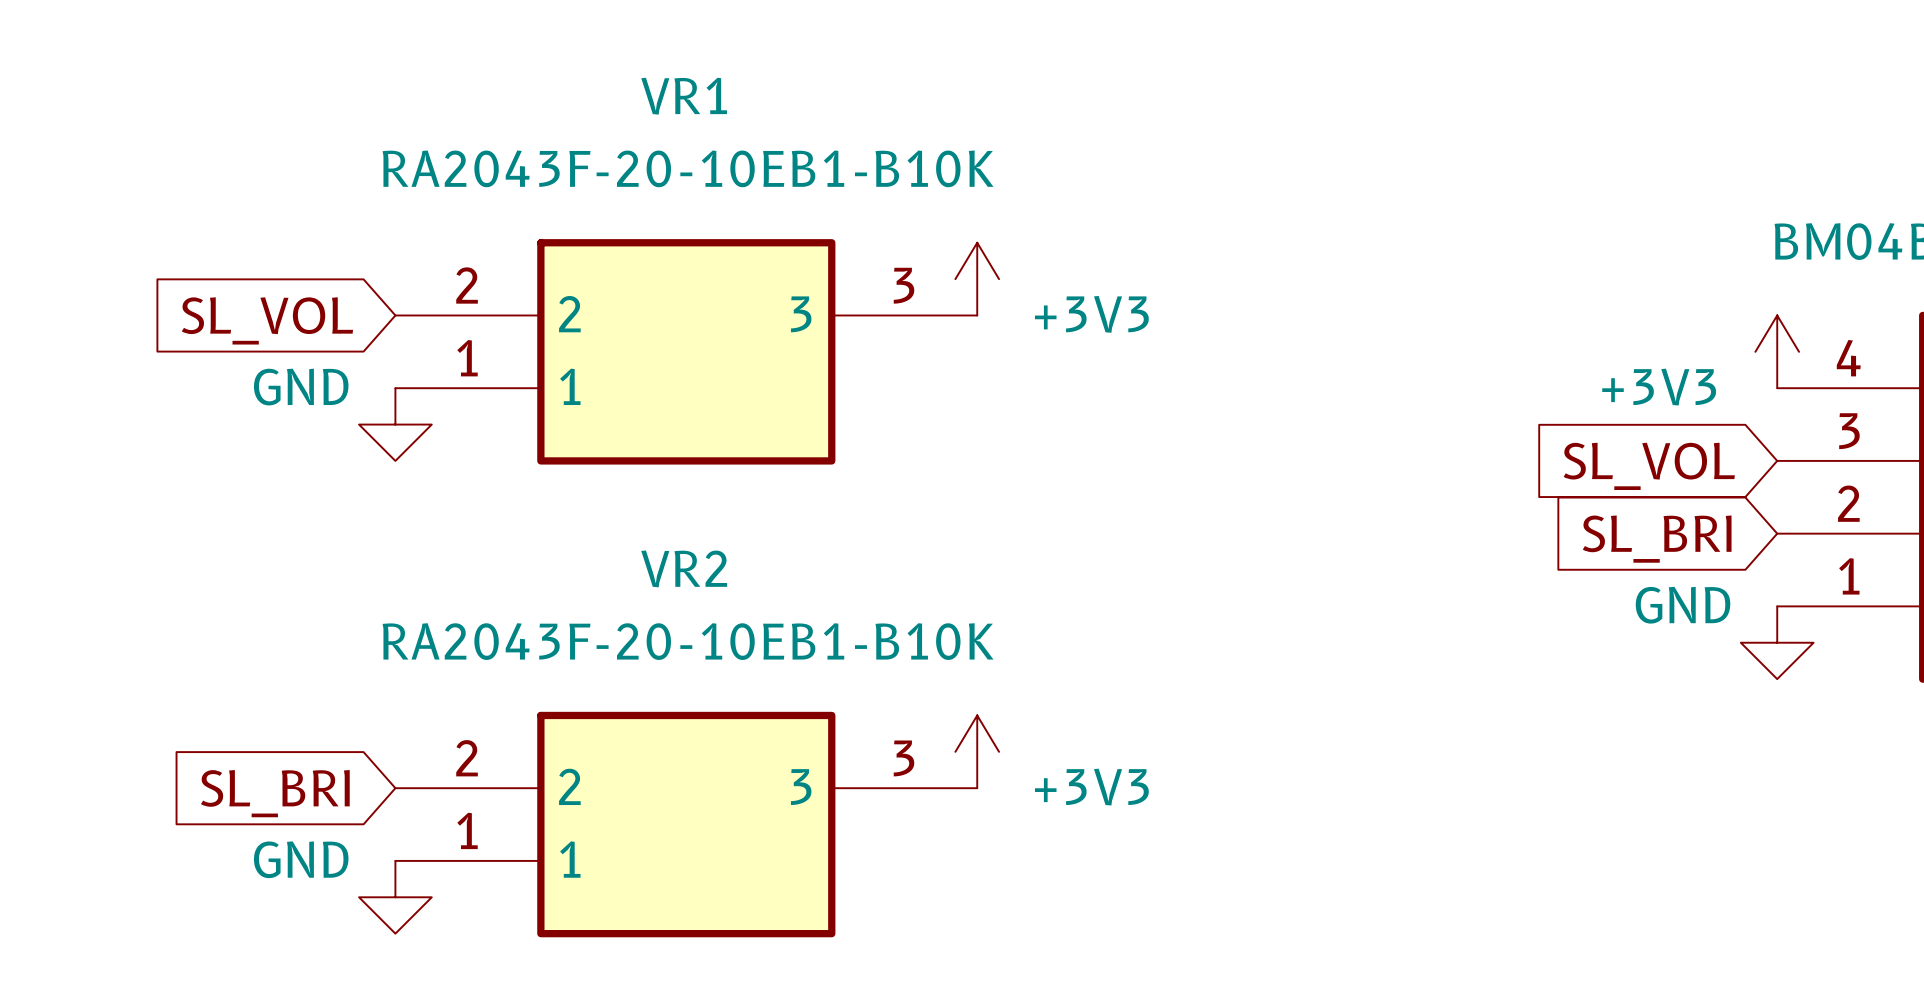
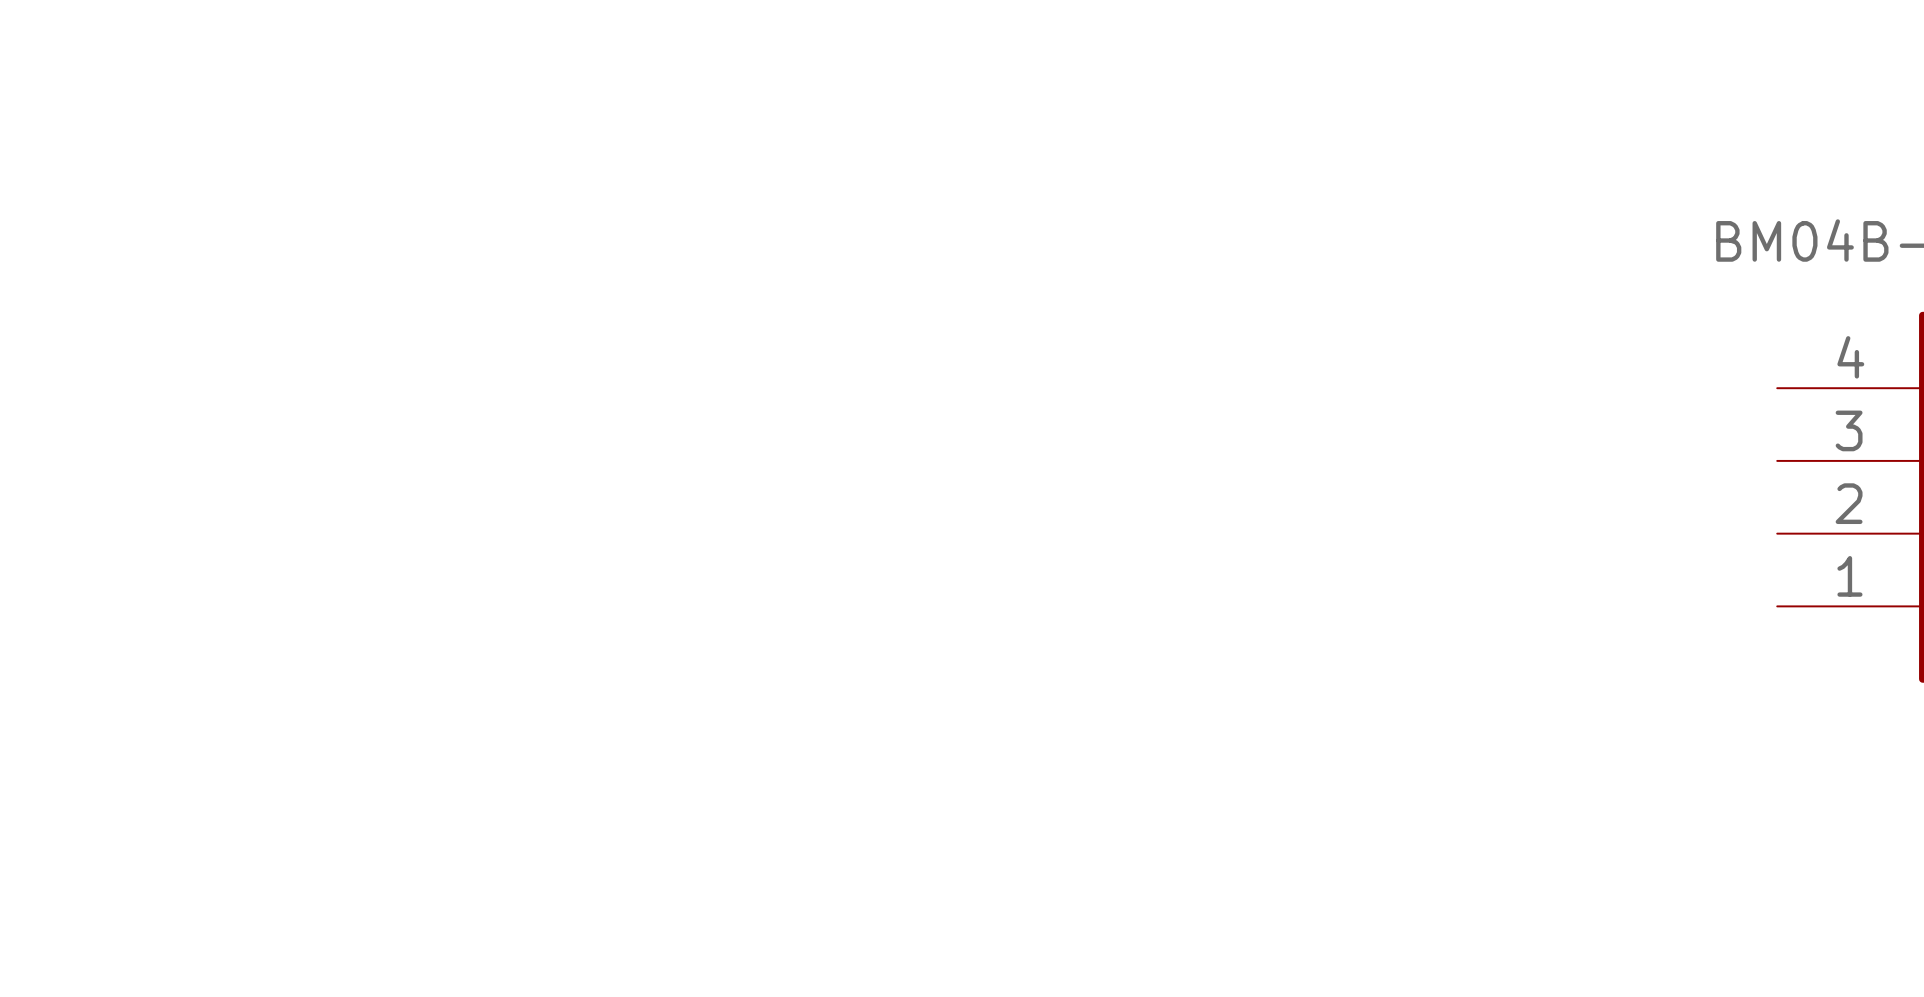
power symbol: +3V3 (977, 279) -> none
global label: SL_VOL (267, 320) -> none
VR1: RA2043F-20-10EB1-B10K (686, 351) -> none
power symbol: +3V3 (1777, 351) -> none
power symbol: GND (395, 424) -> none
global label: SL_VOL (1649, 466) -> none
global label: SL_BRI (1657, 539) -> none
power symbol: GND (1777, 642) -> none
power symbol: +3V3 (977, 751) -> none
global label: SL_BRI (275, 793) -> none
VR2: RA2043F-20-10EB1-B10K (686, 824) -> none
power symbol: GND (395, 897) -> none

